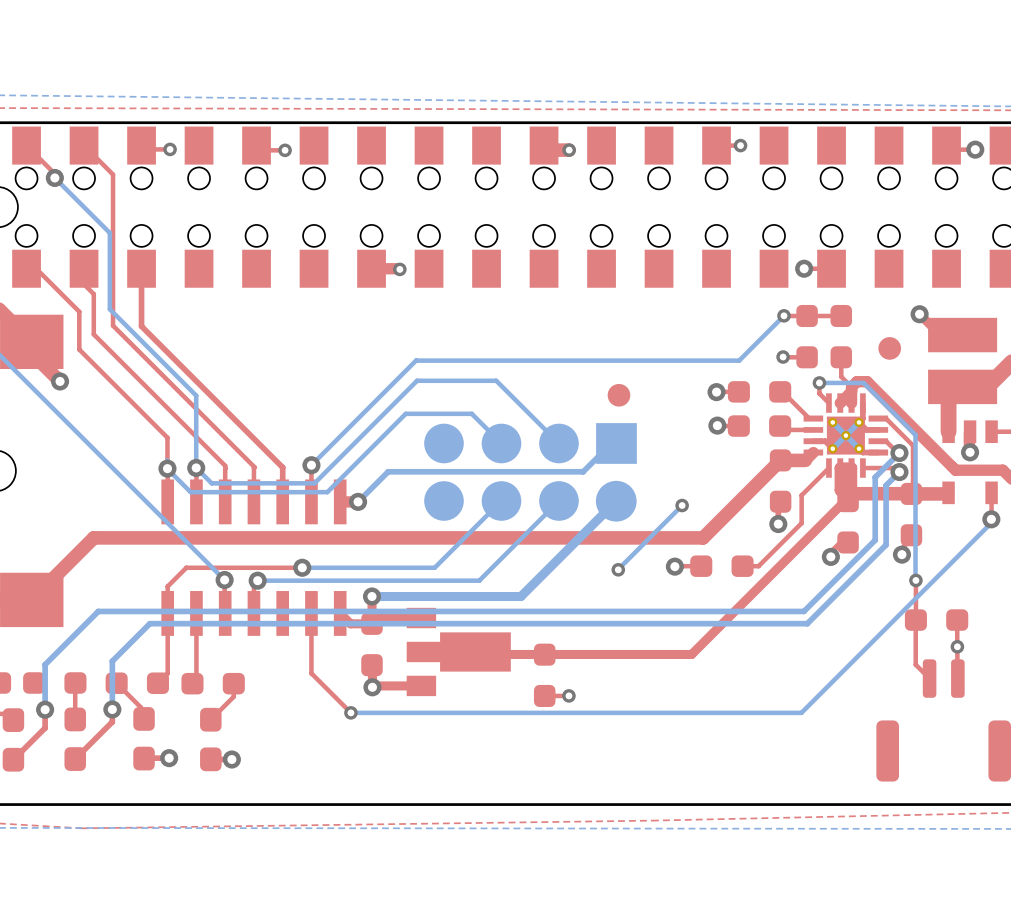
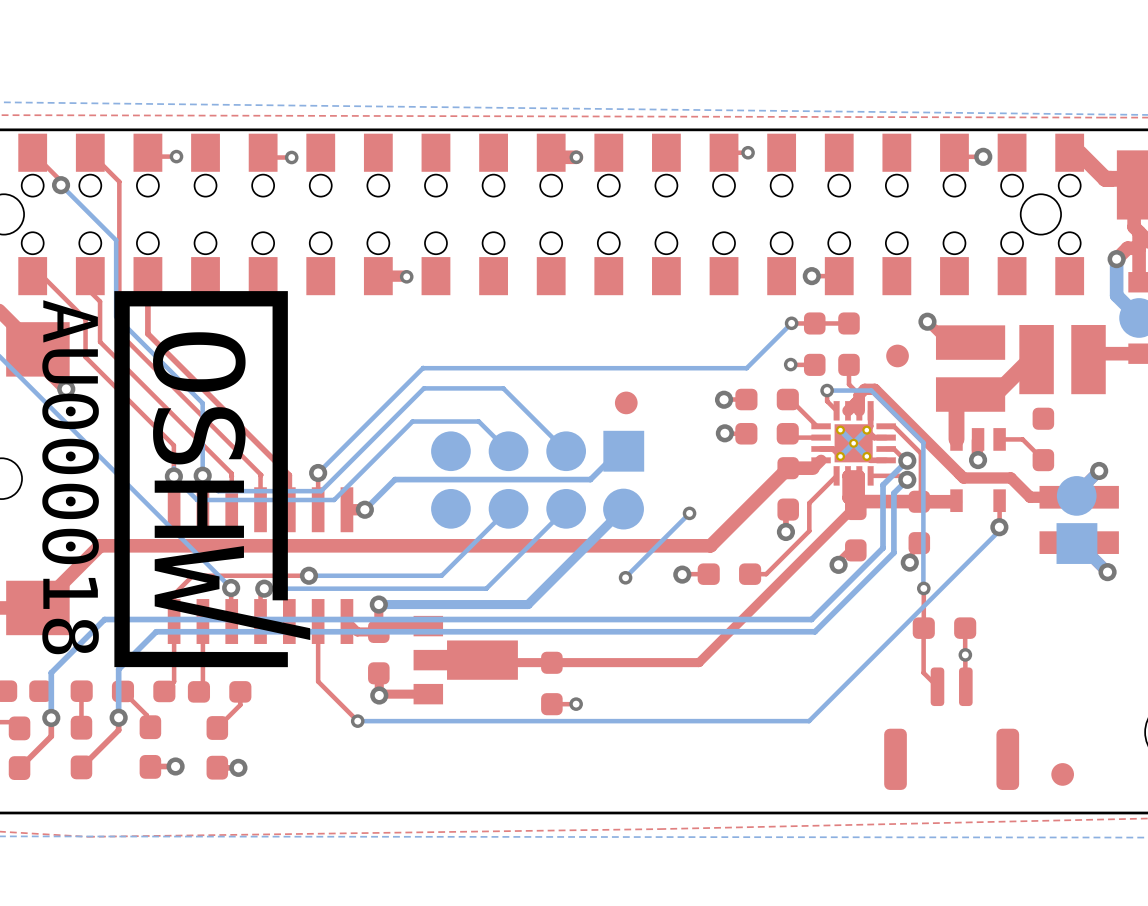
drawing: none -> [42, 291, 311, 668]

